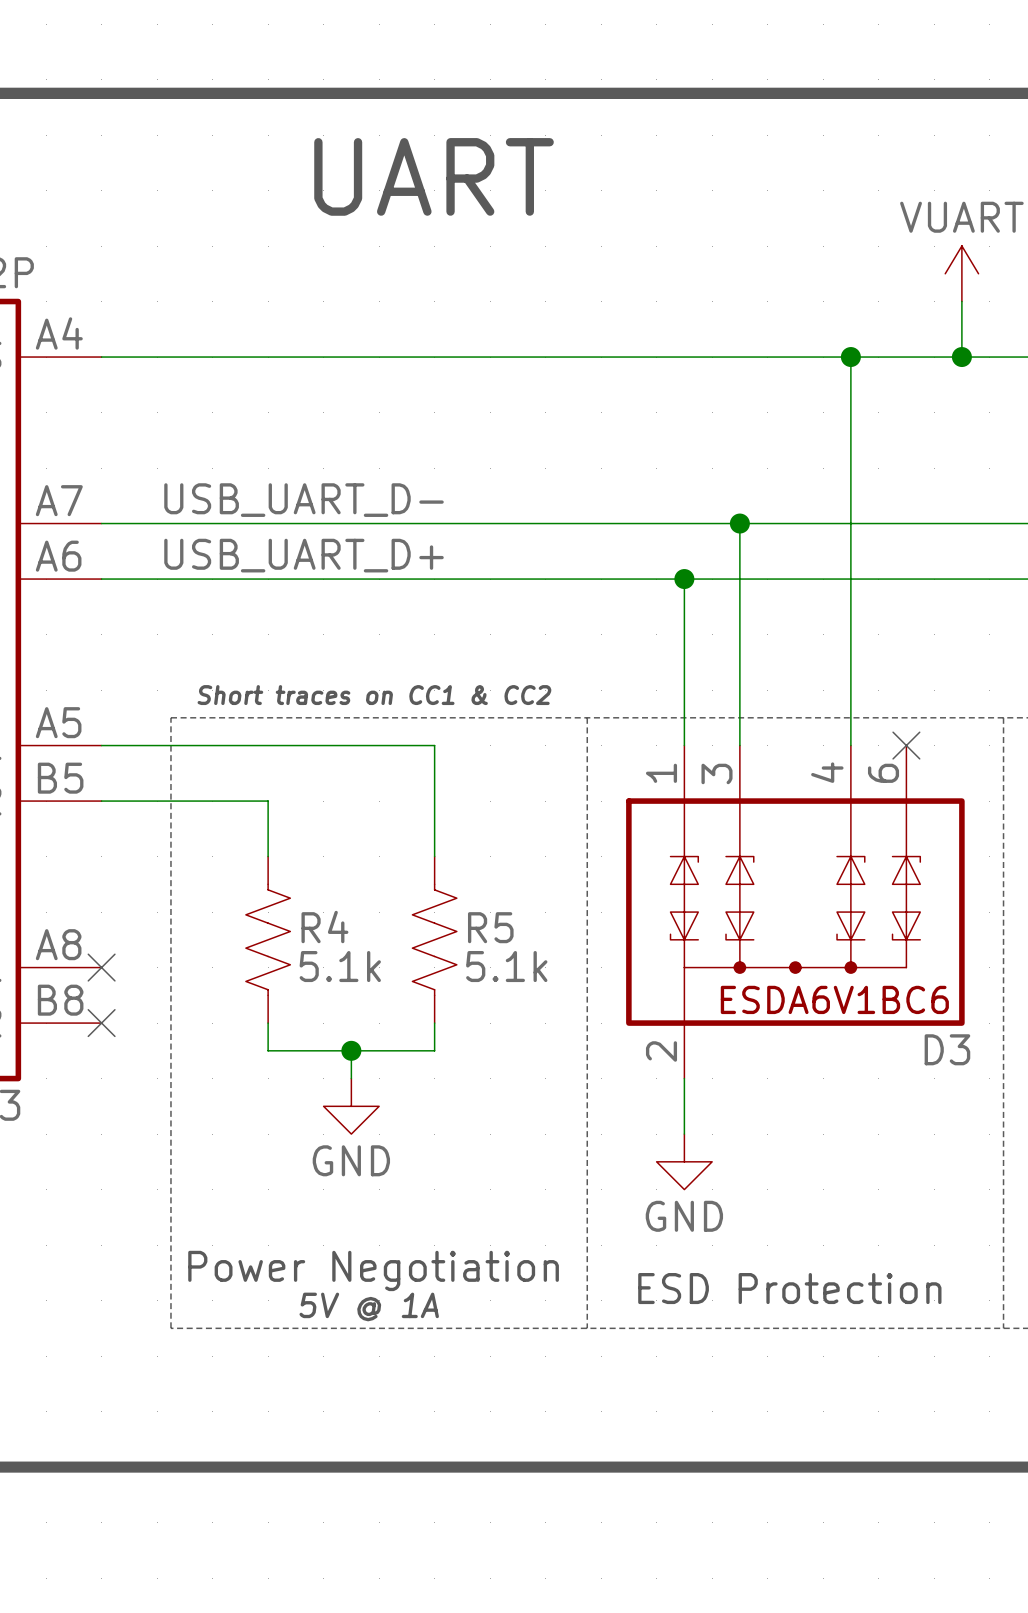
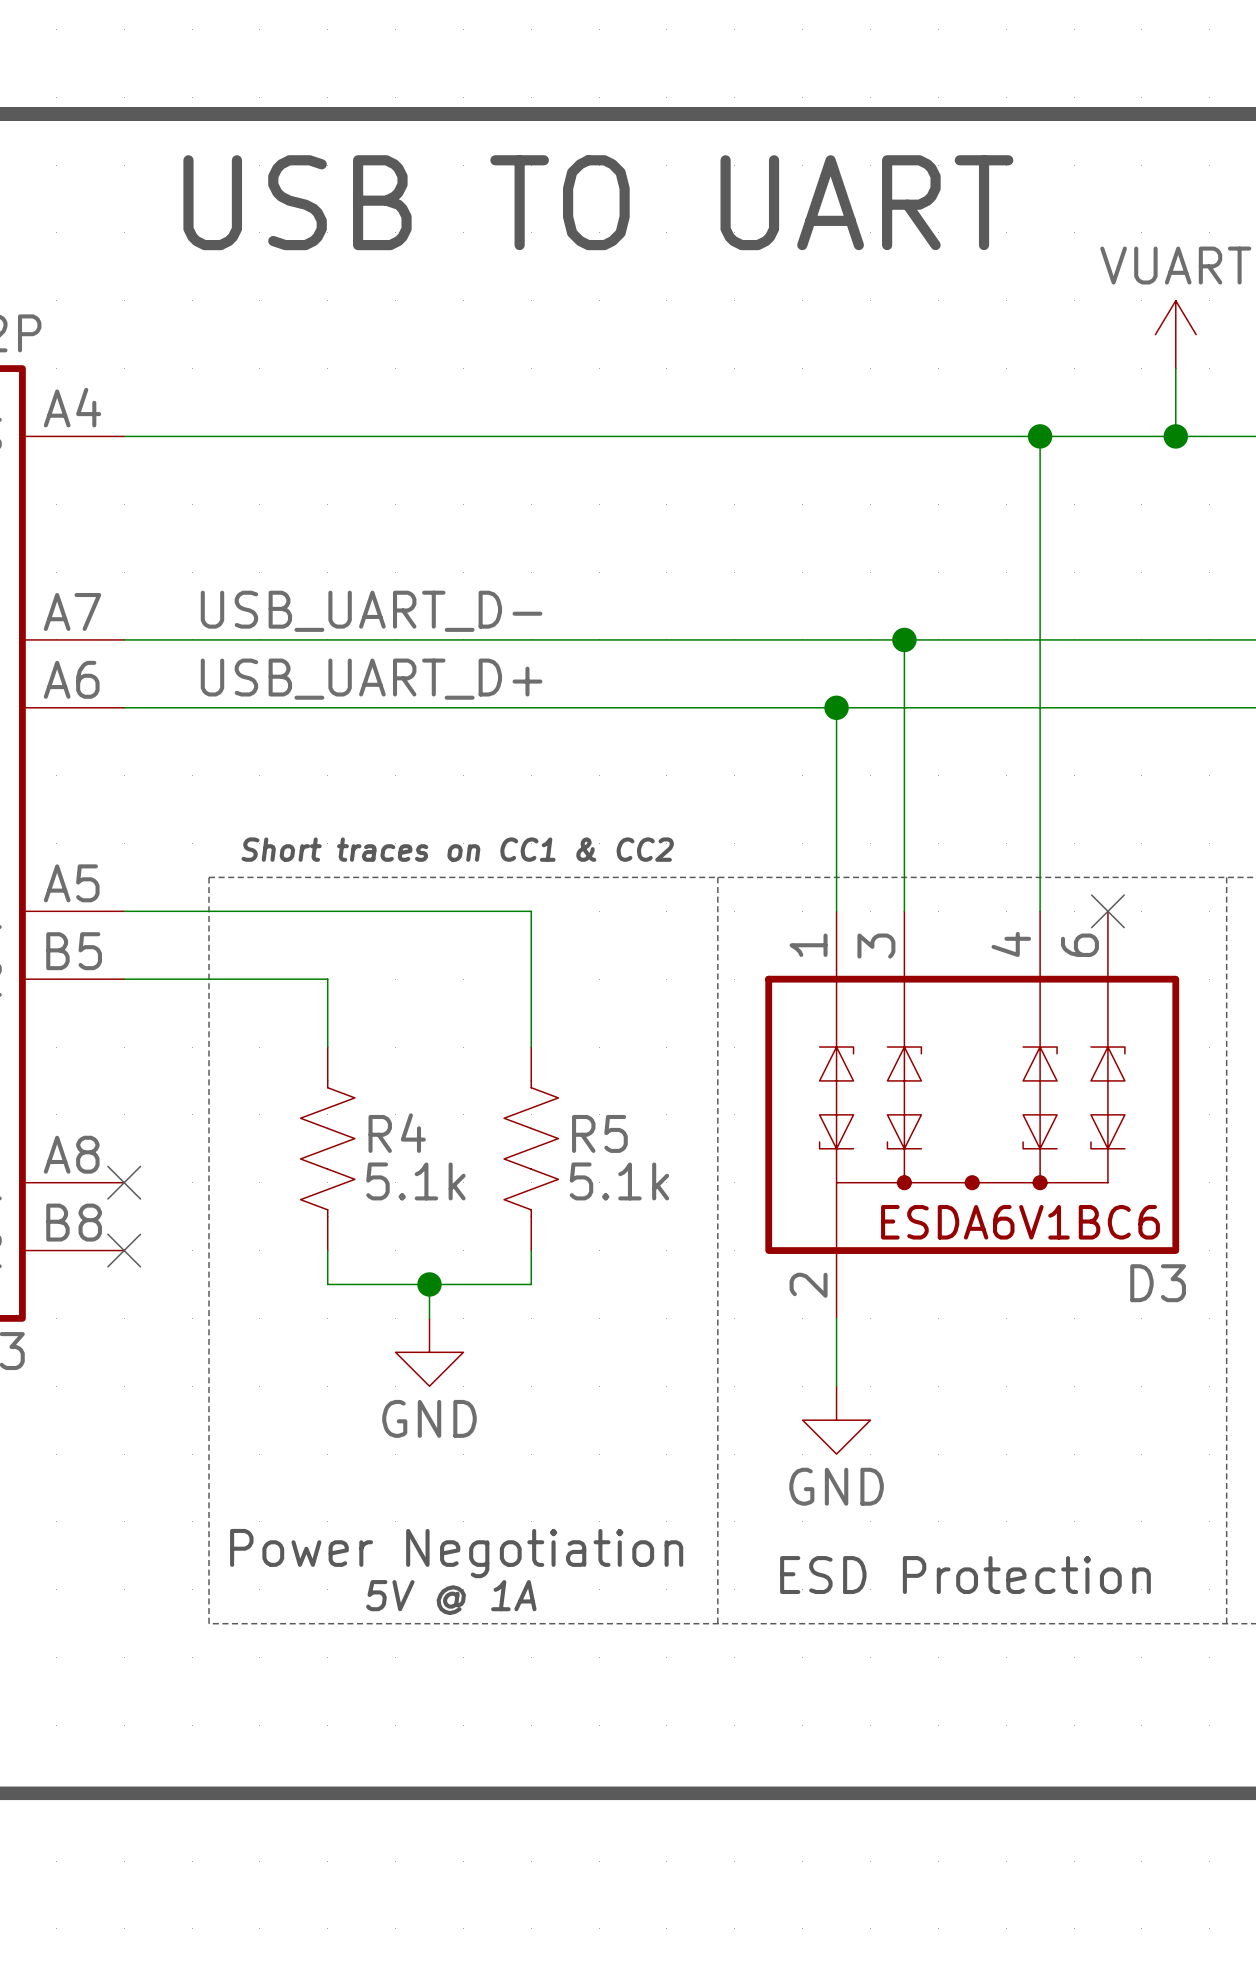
text: none -> USB TO UART (598, 202)
text: UART (434, 176) -> none

